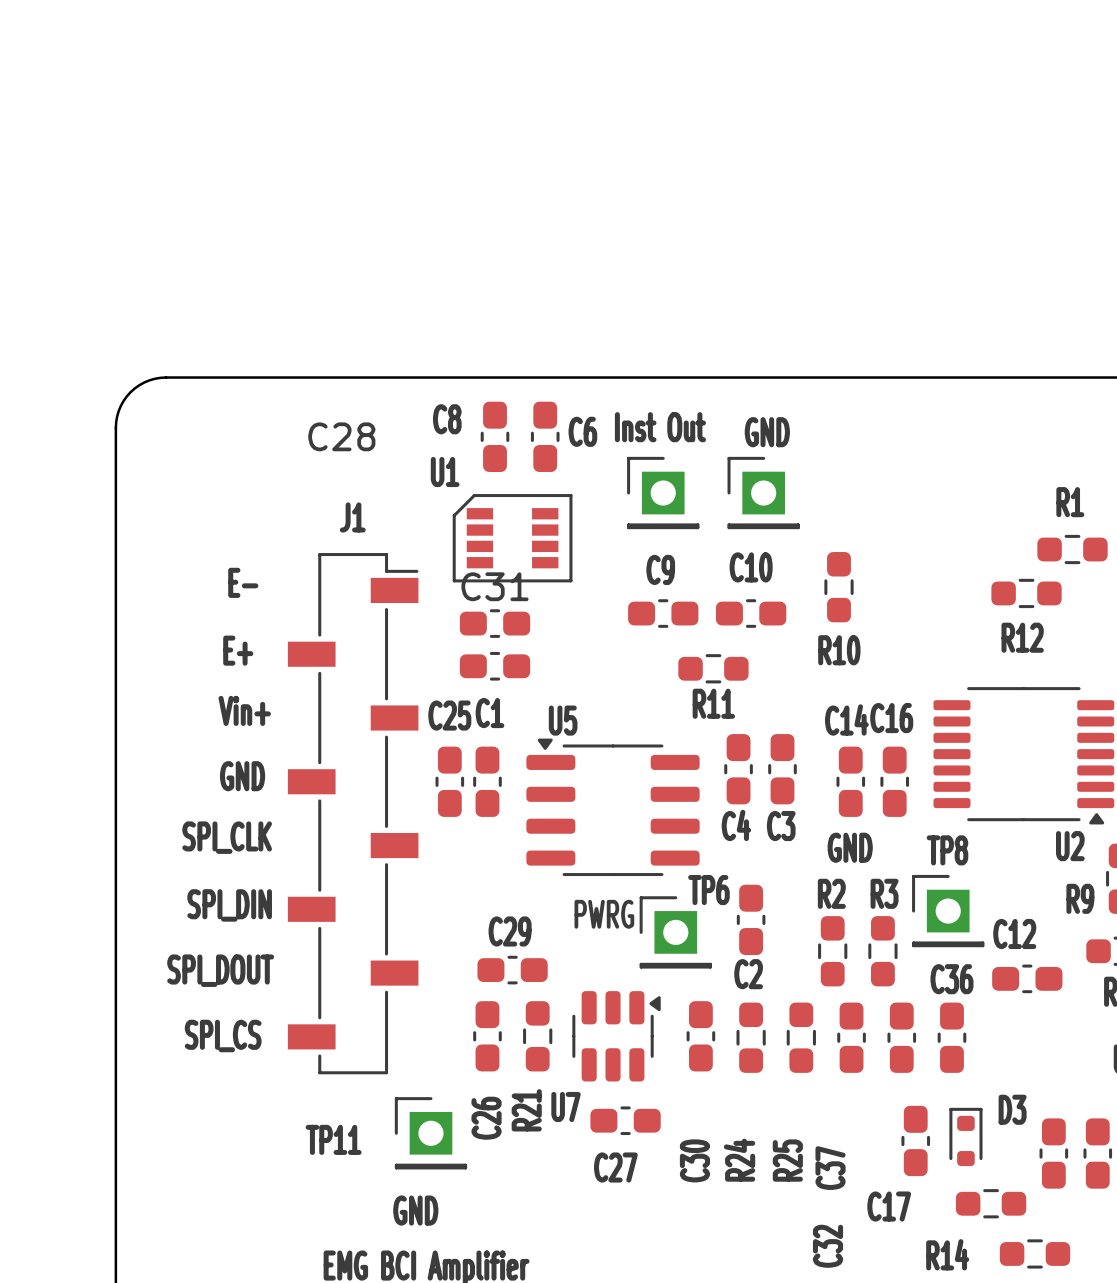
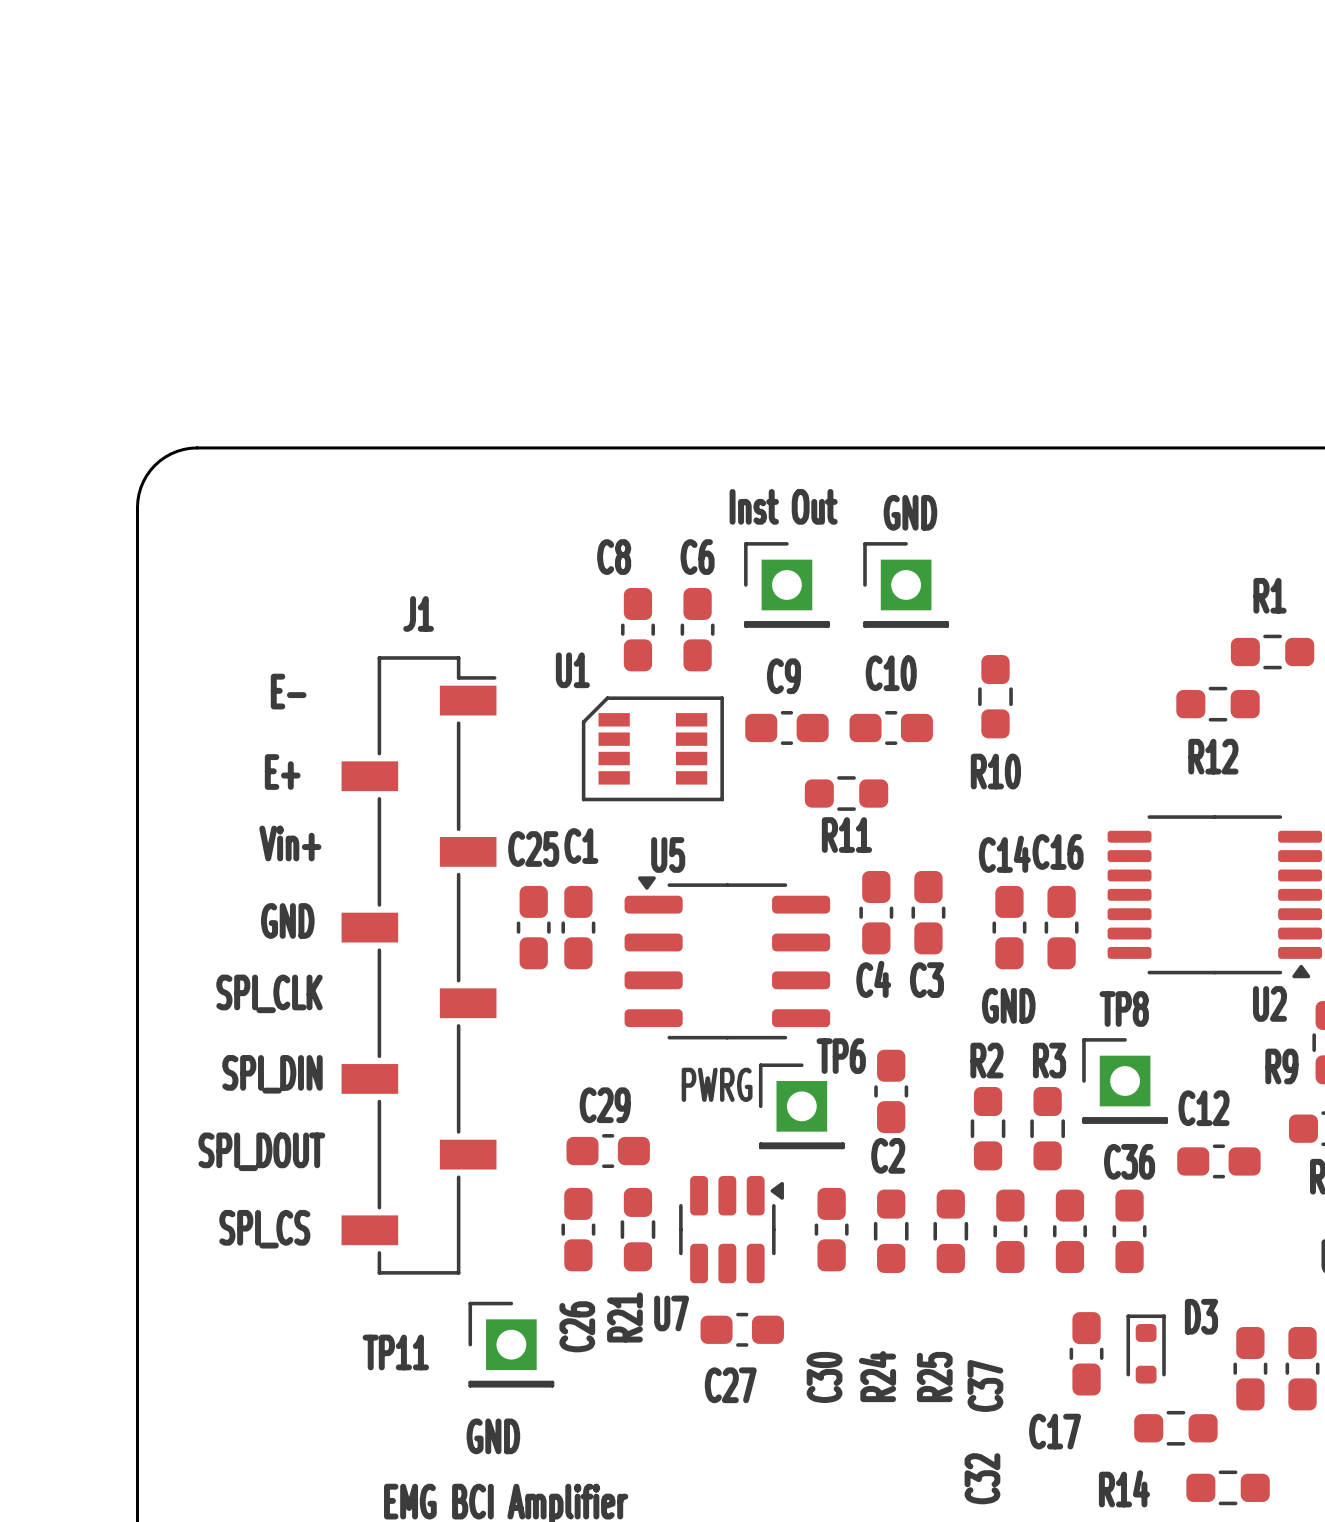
C8 name position: C8 (447, 419) -> C8 (614, 557)
C6 name position: C6 (582, 431) -> C6 (697, 557)
C8 position: (495, 436) -> (637, 629)
C6 position: (545, 436) -> (697, 629)
U1 position: (512, 538) -> (652, 748)
C31: (495, 623) -> none
C28: (495, 666) -> none

